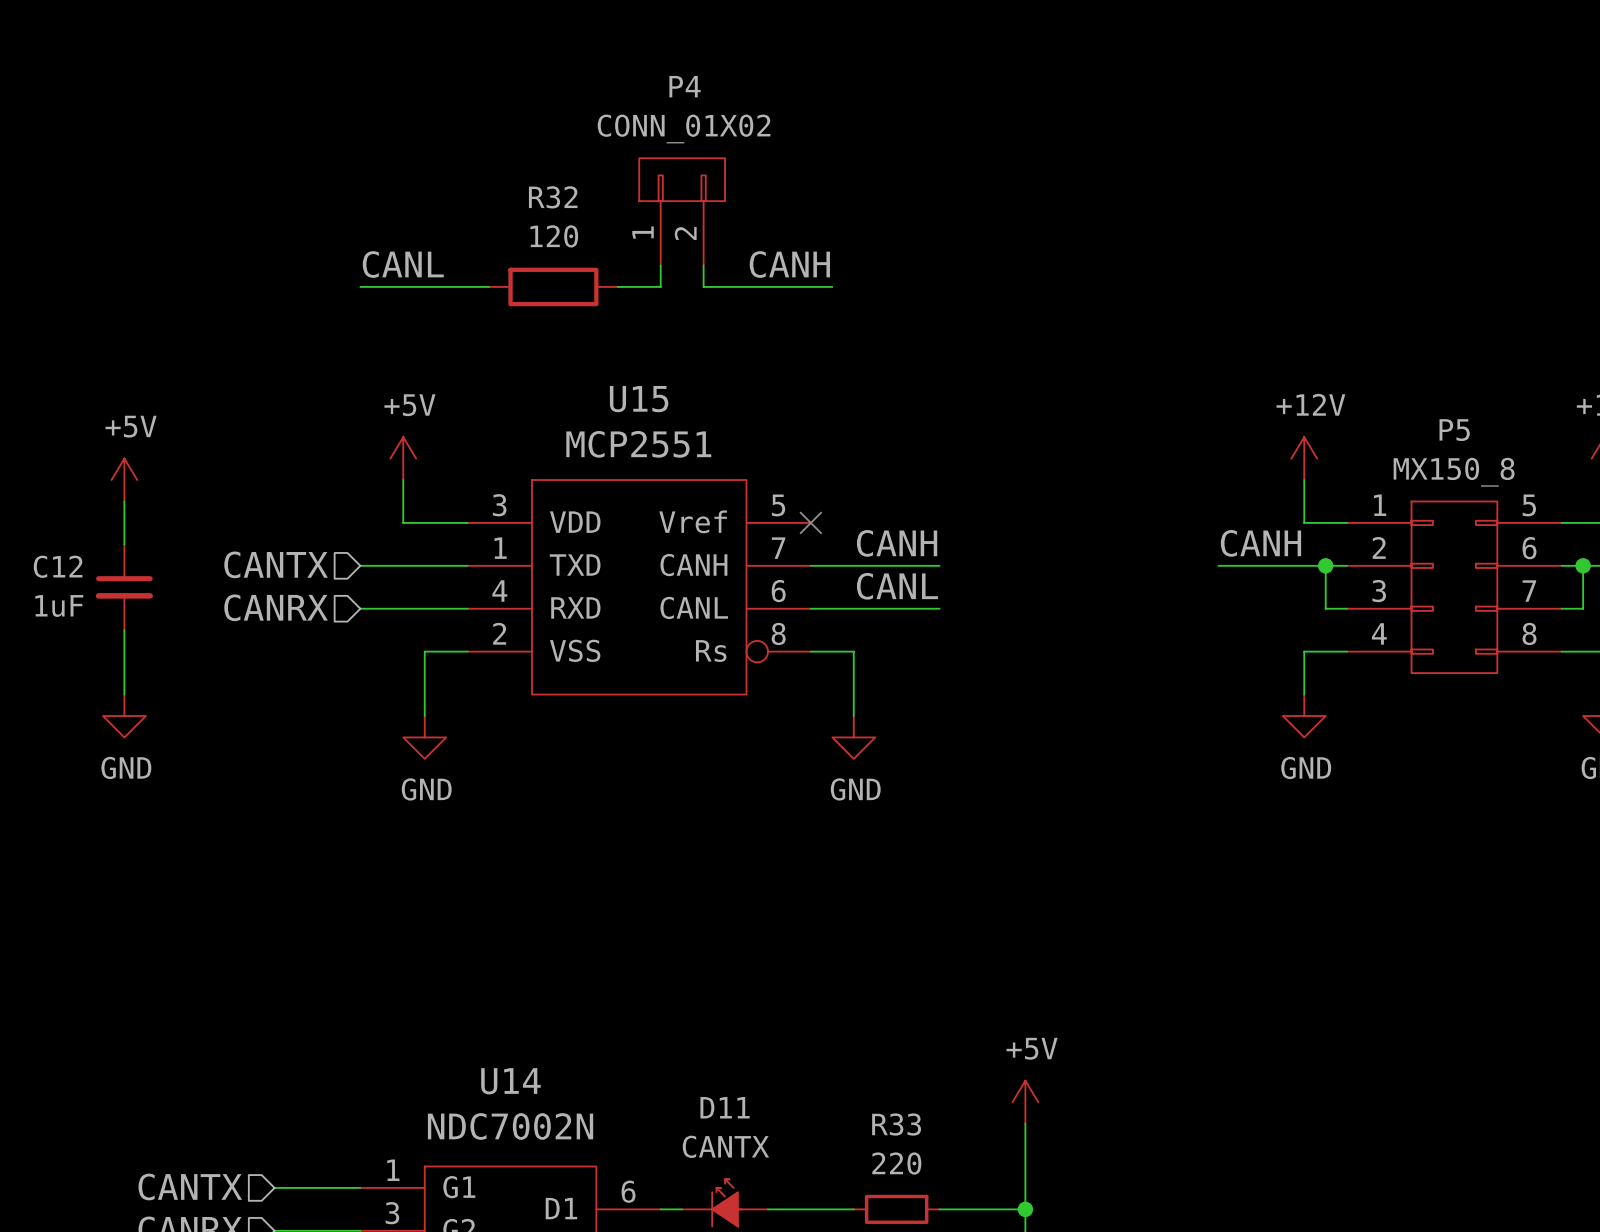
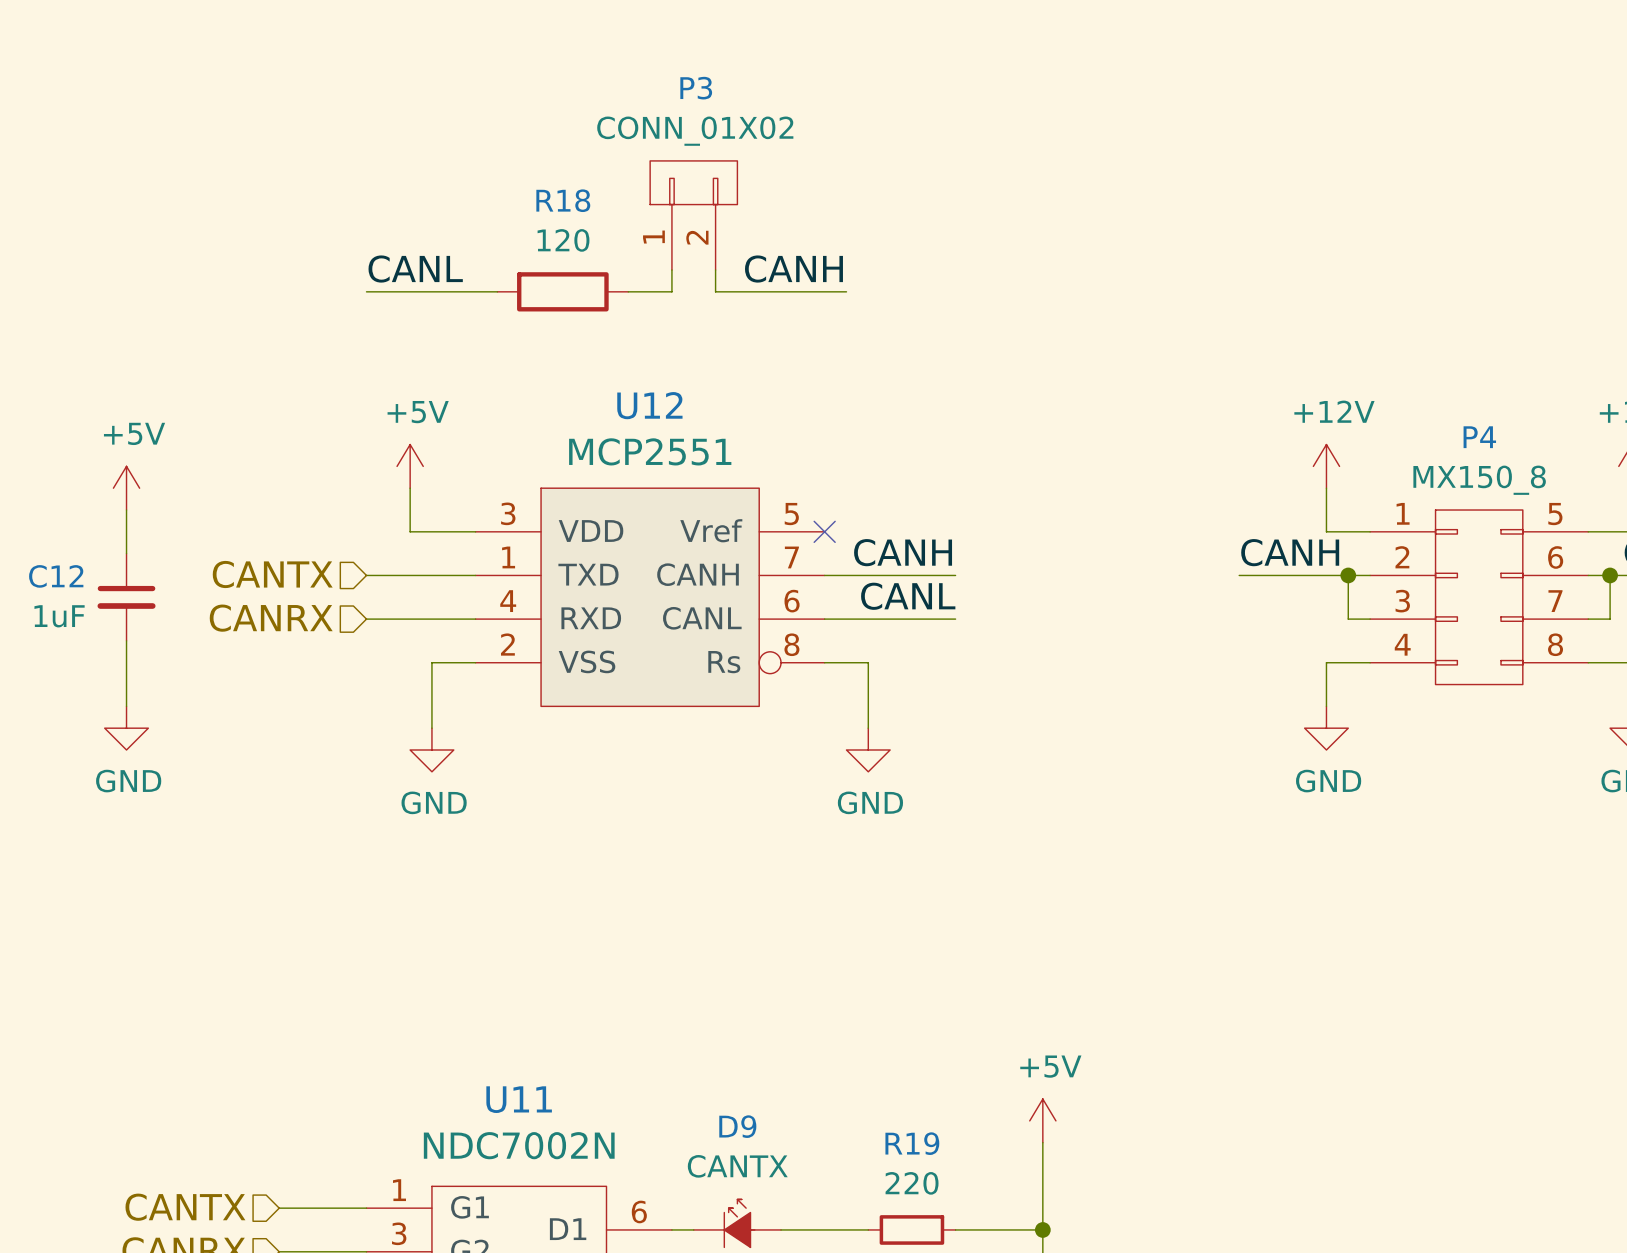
P4 name: P4 (685, 86) -> P3 (696, 88)
R32 name: R32 (553, 197) -> R18 (563, 200)
U15 name: U15 (639, 399) -> U12 (649, 405)
P5 name: P5 (1454, 430) -> P4 (1479, 437)
U14 name: U14 (510, 1081) -> U11 (519, 1099)
D11 name: D11 (725, 1107) -> D9 (737, 1126)
R33 name: R33 (896, 1124) -> R19 (912, 1143)

